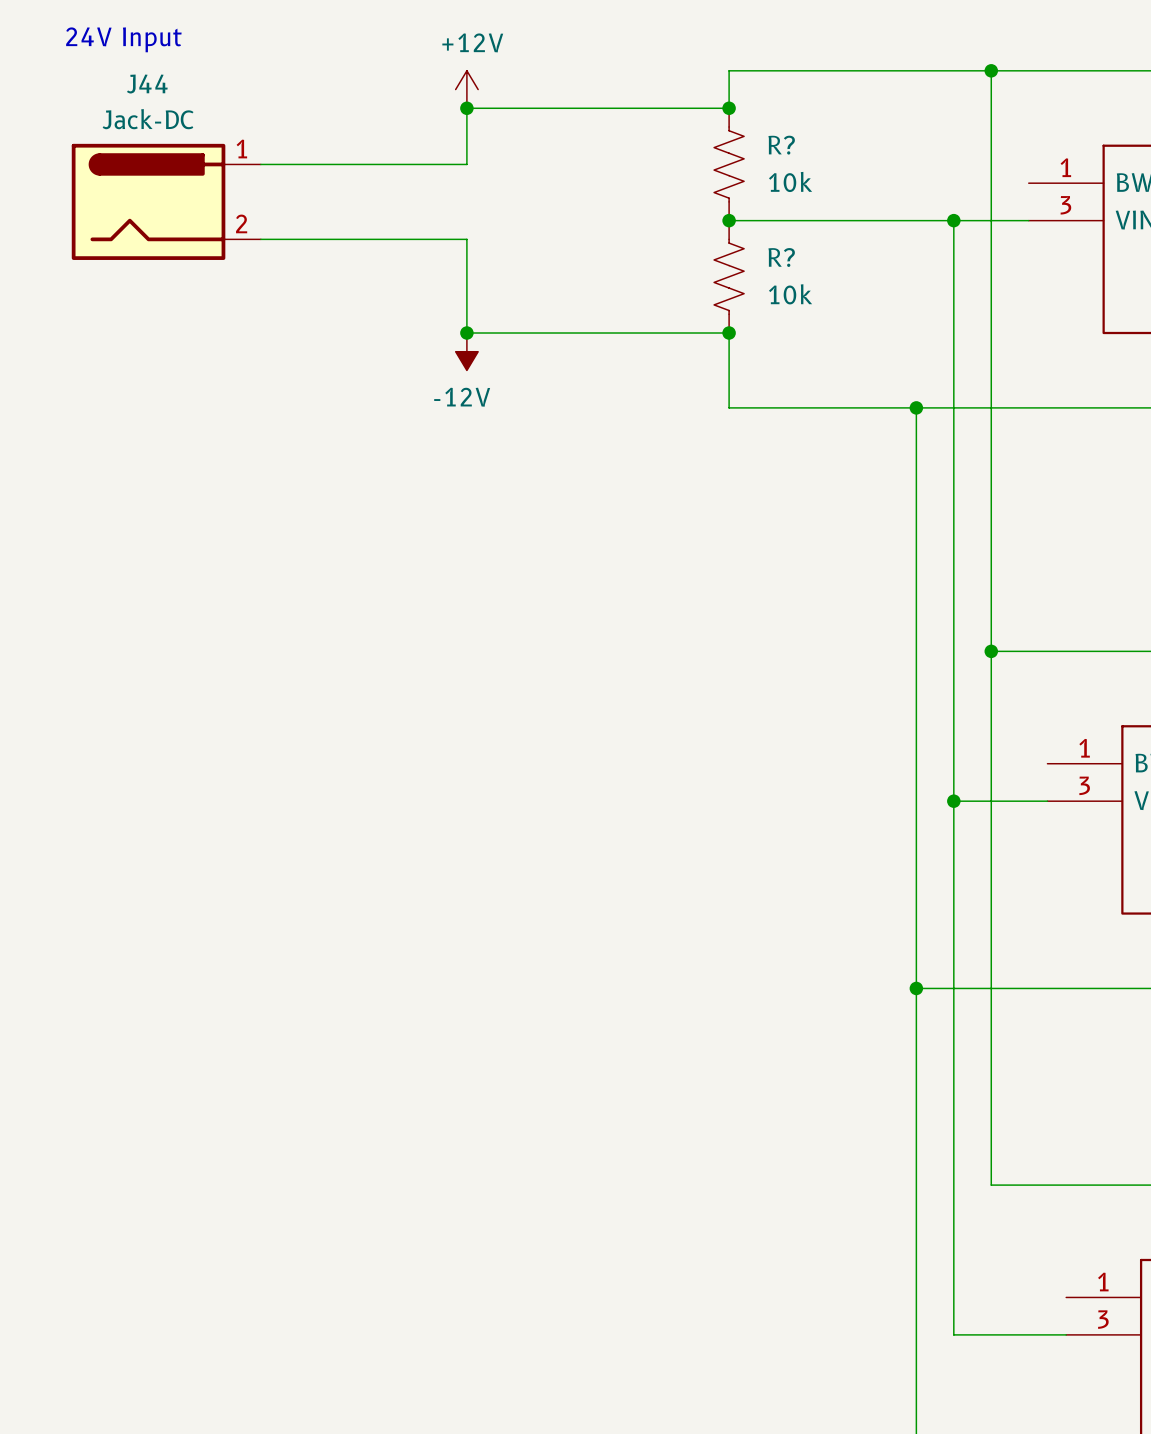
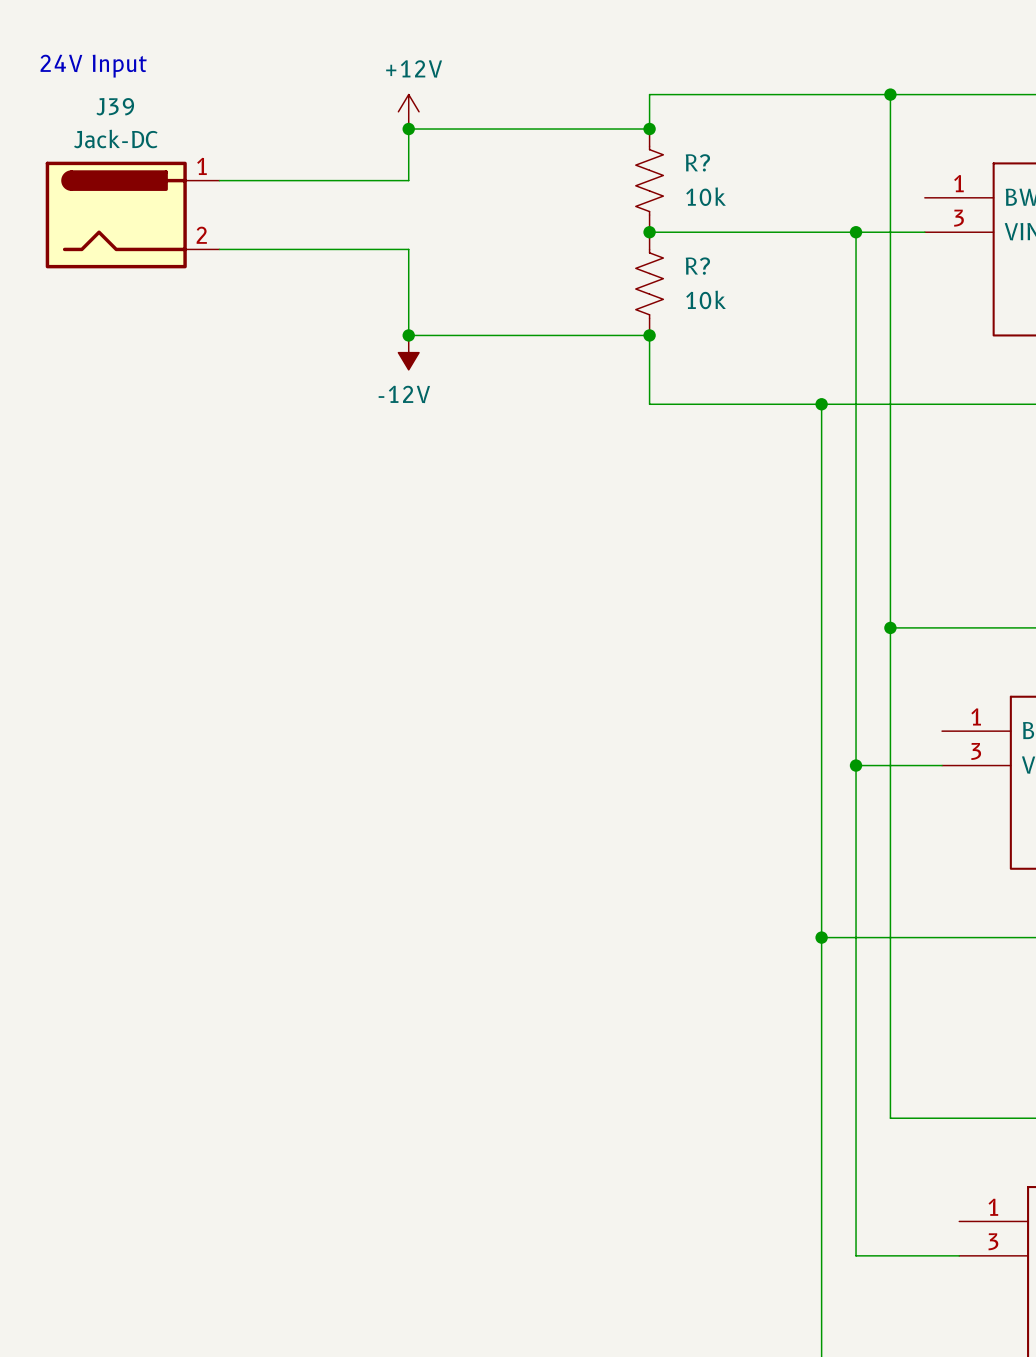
J44 name: J44 (147, 84) -> J39 (115, 106)

